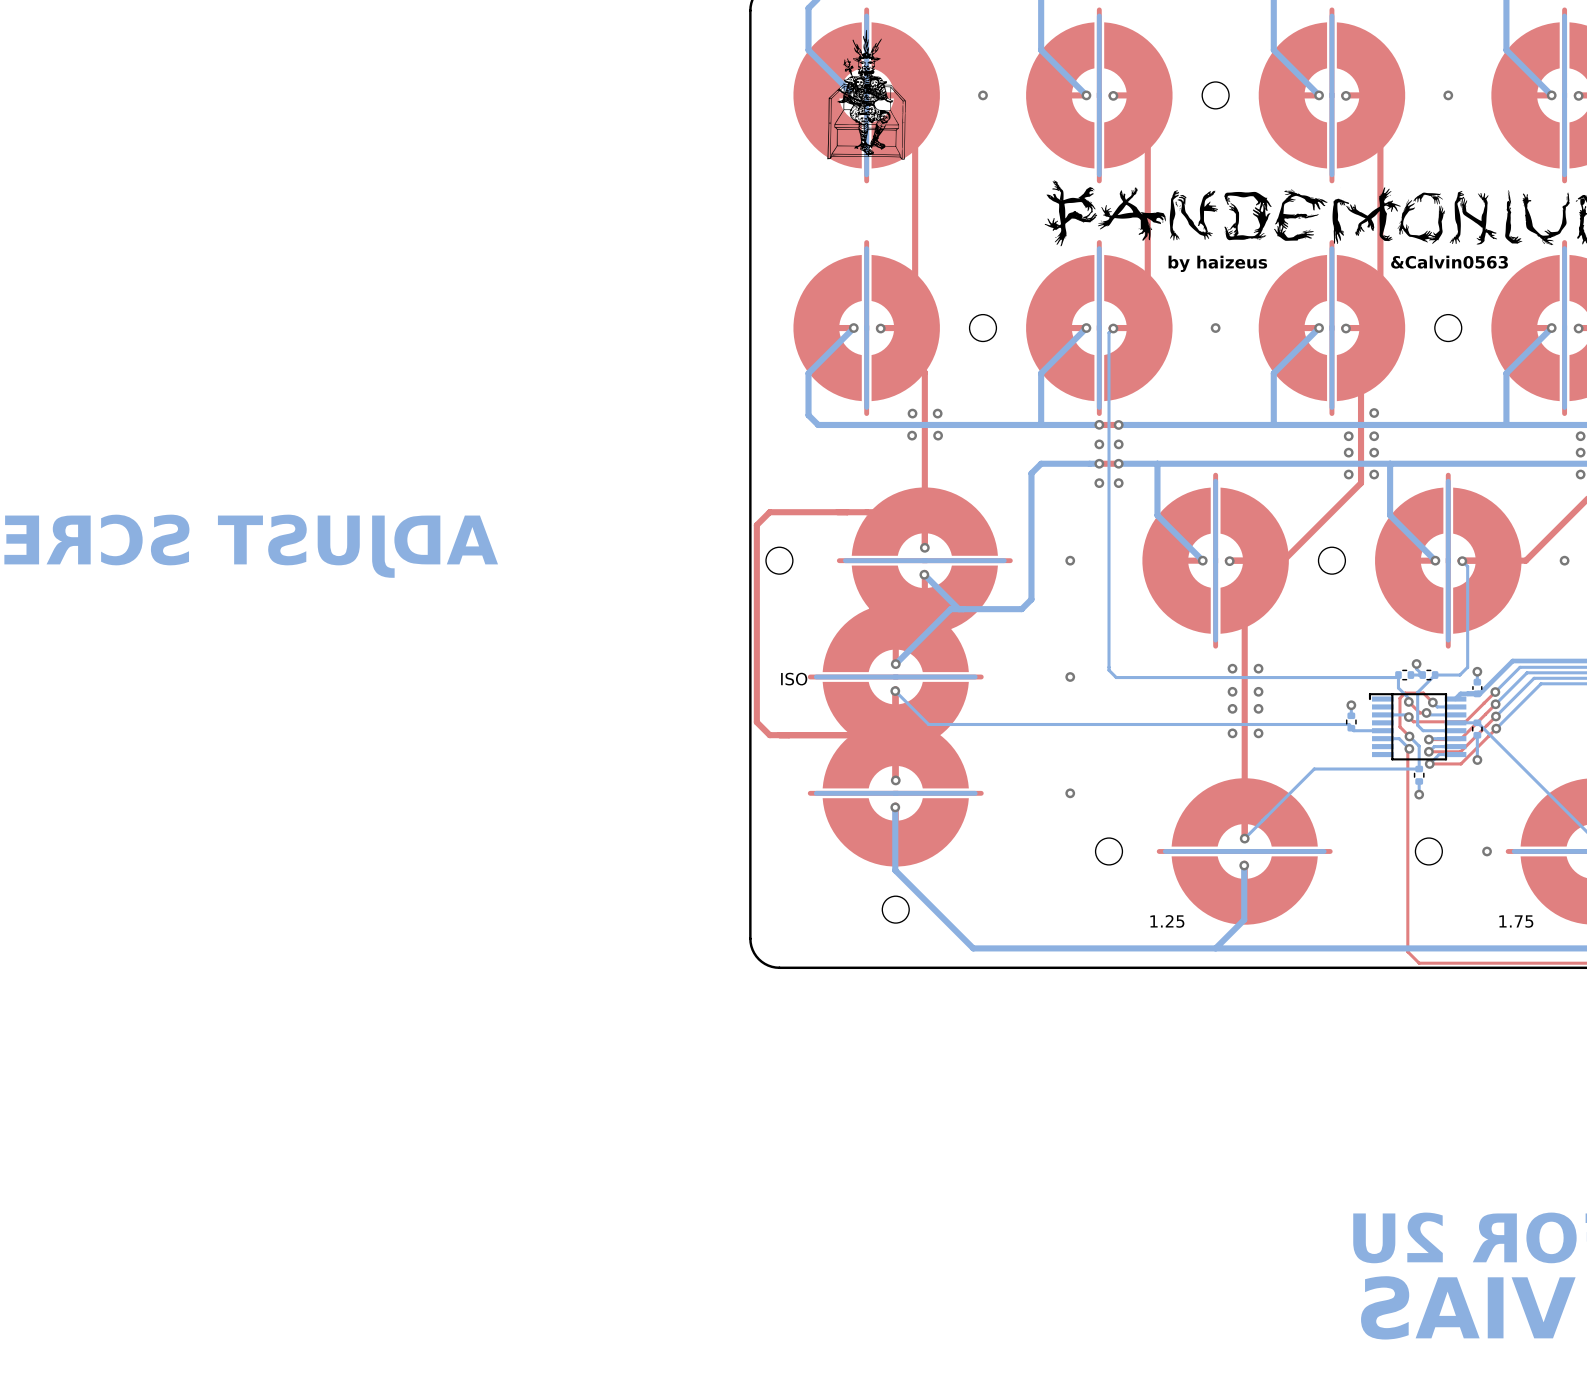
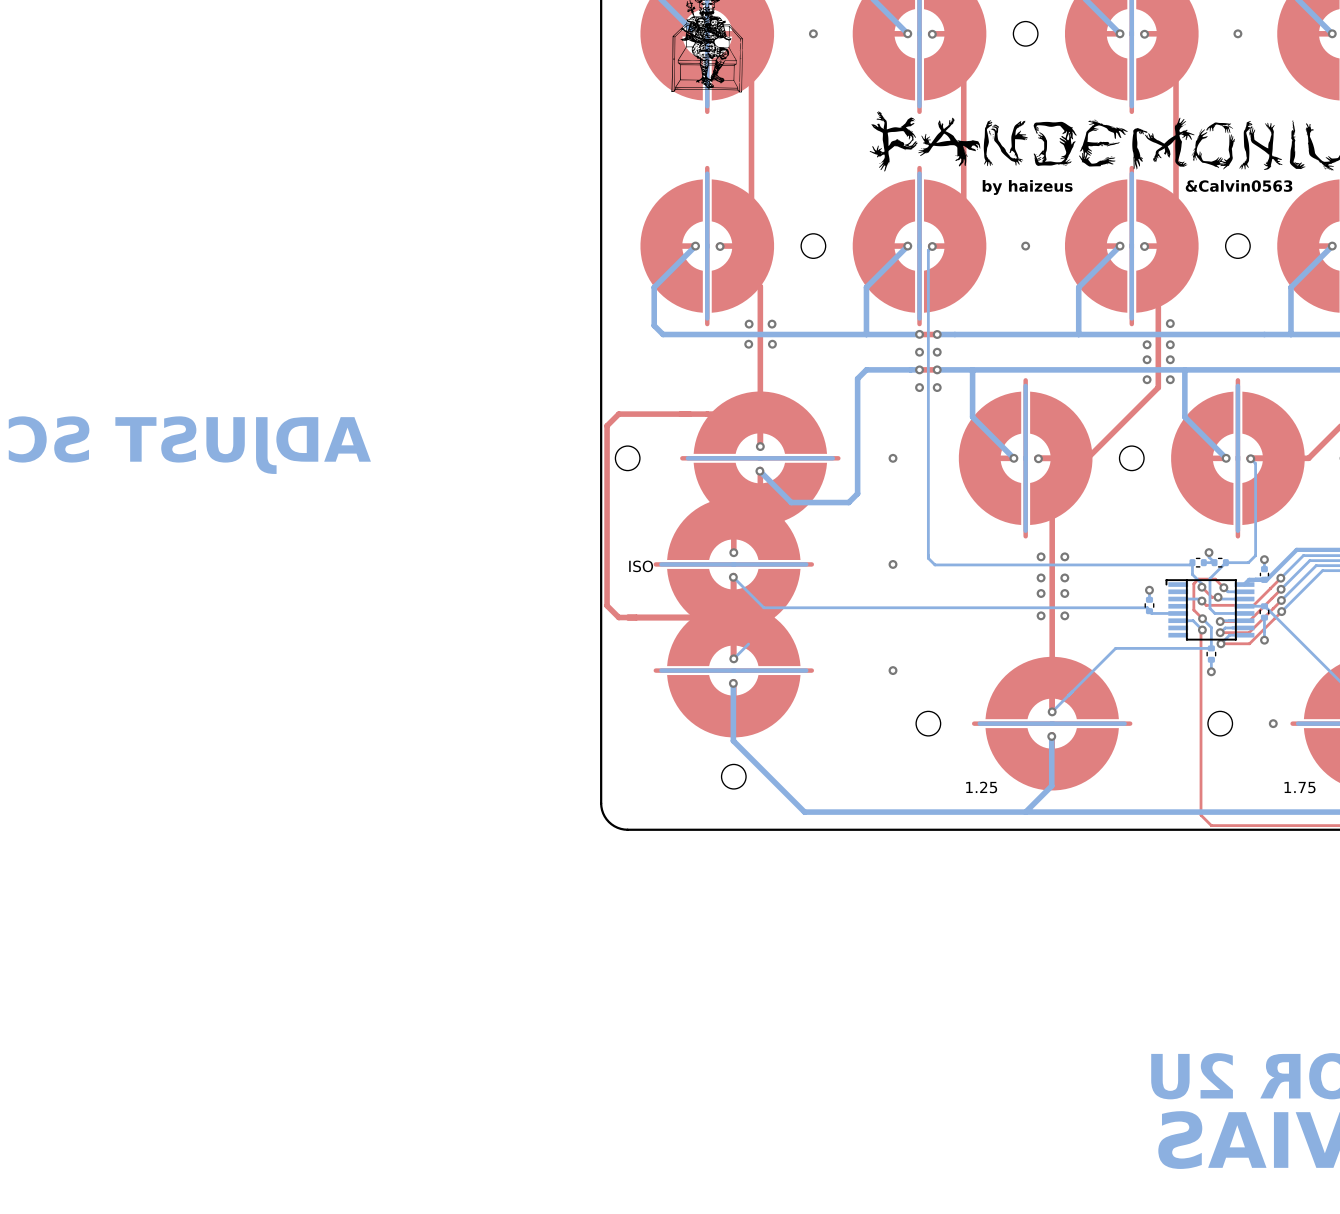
bottom track: (958, 609) (950, 609) (895, 664) -> none
bottom track: none -> (748, 644) (733, 658)

